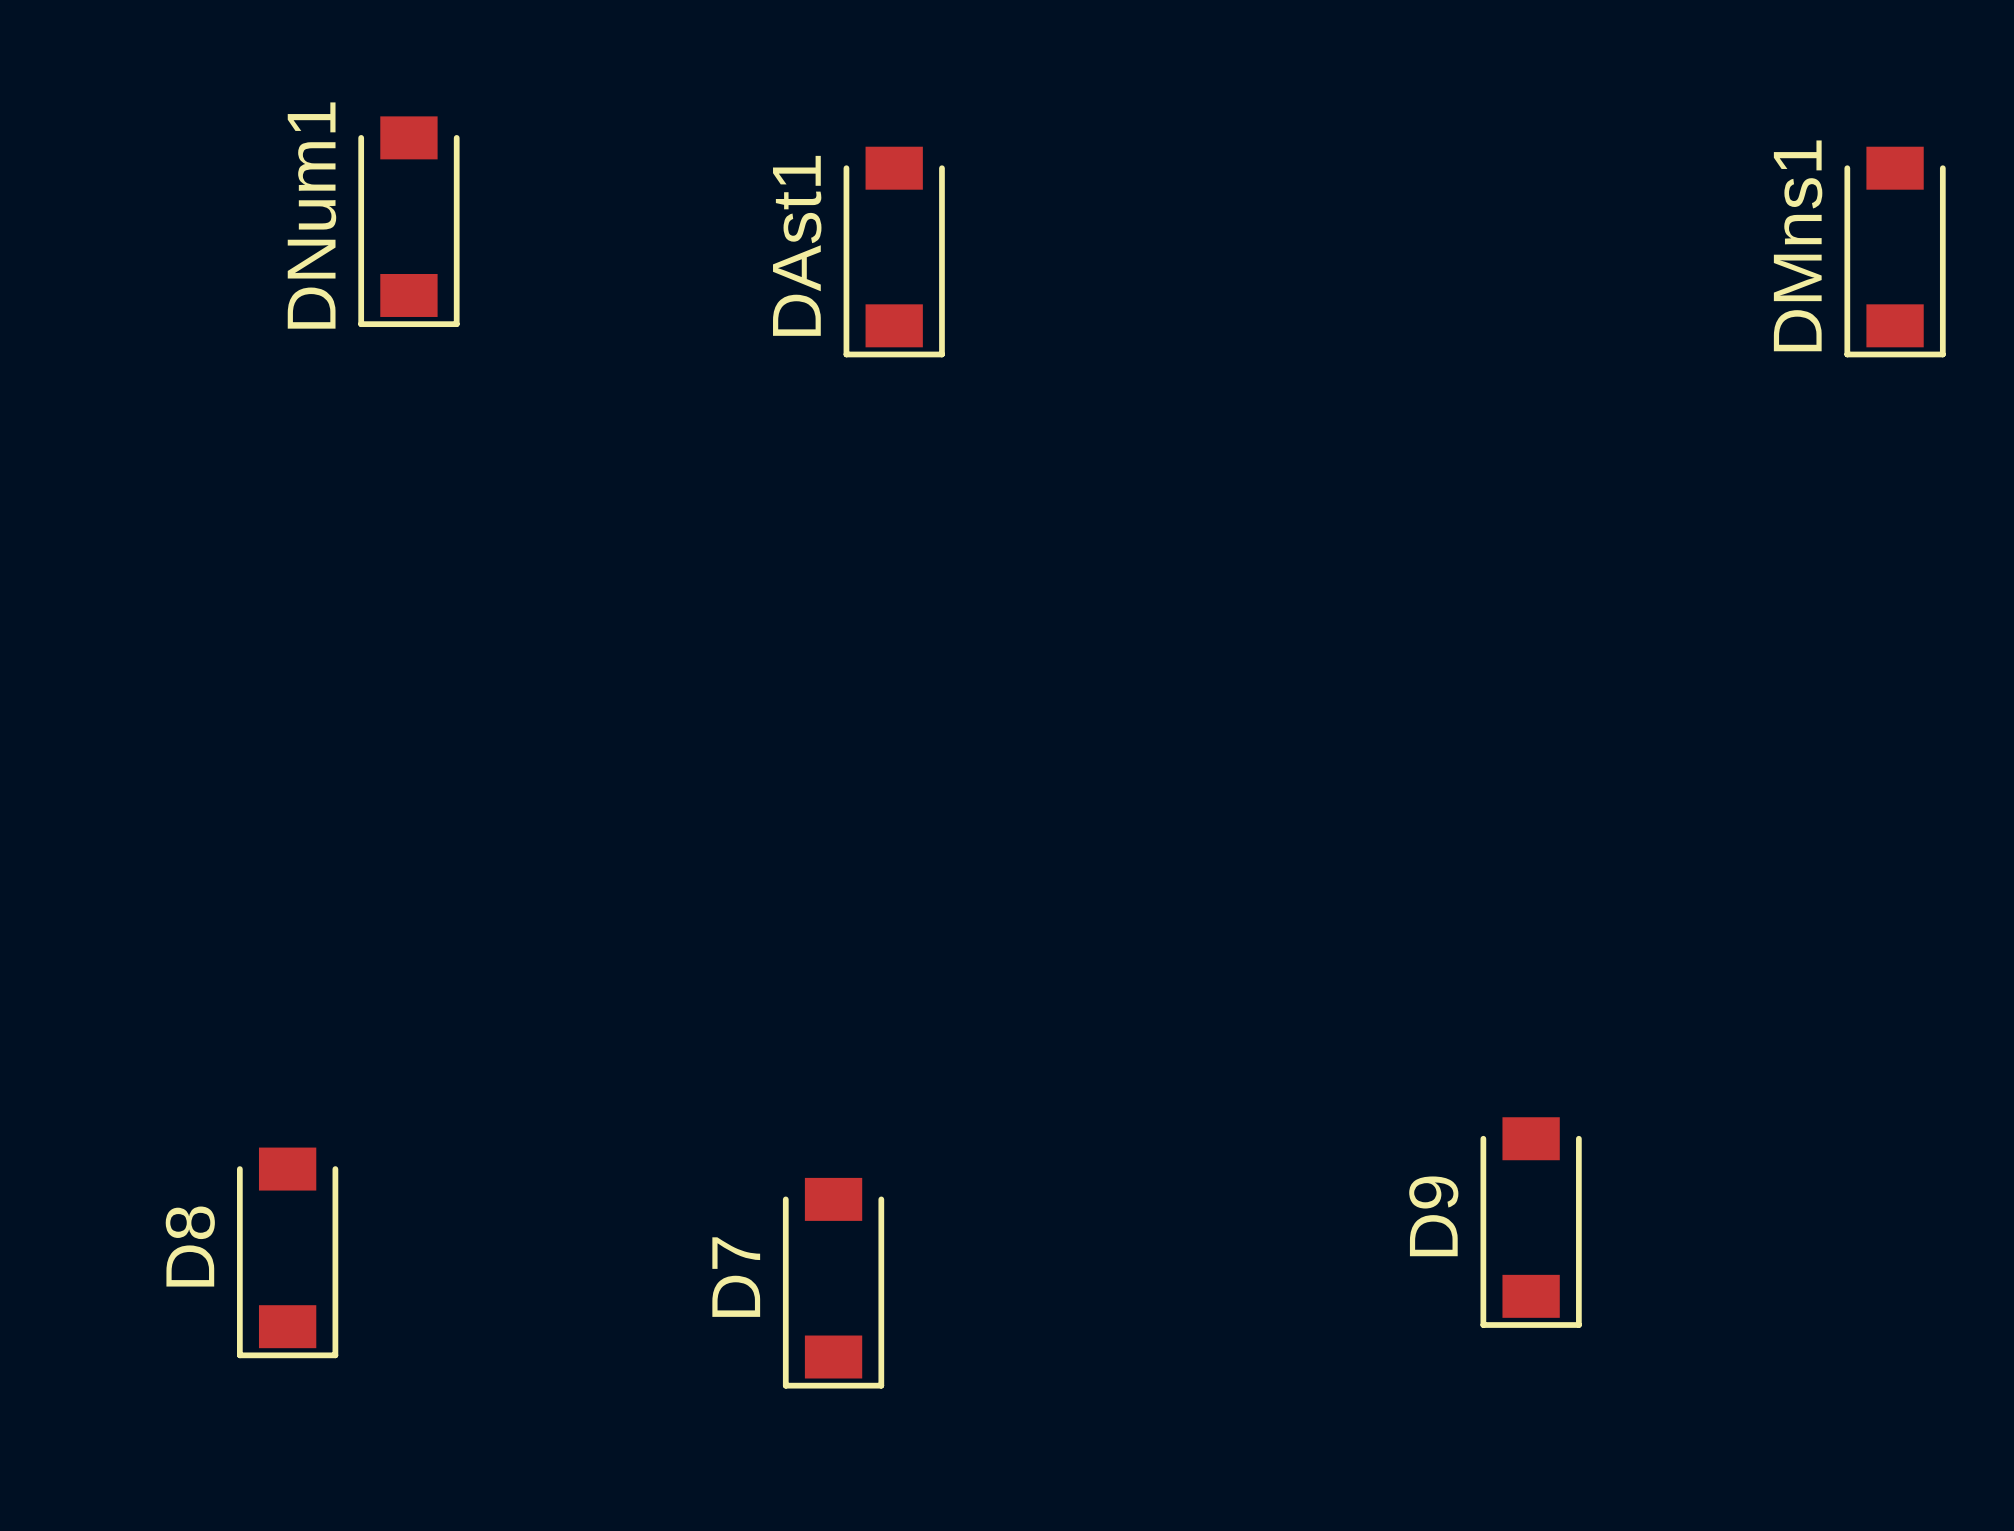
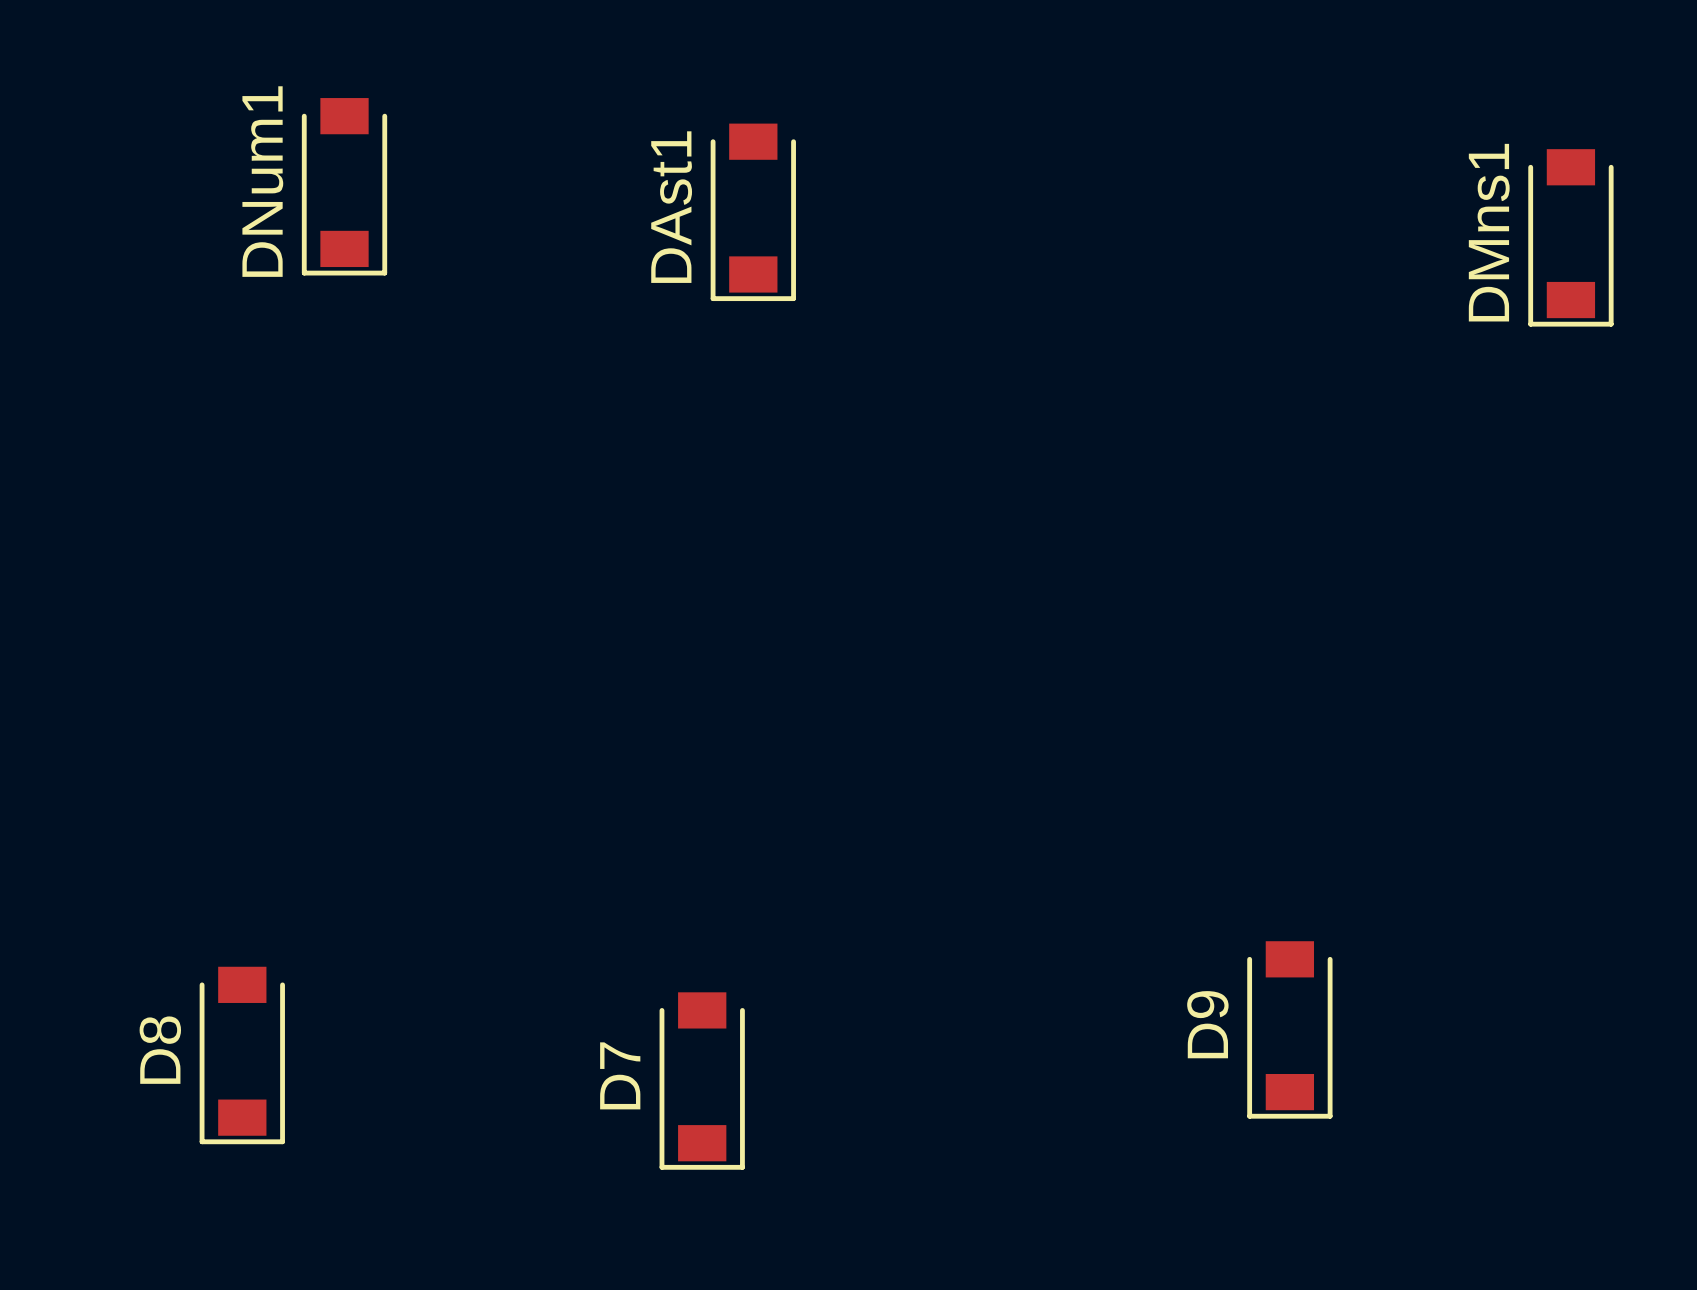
DMns1 position: (1895, 252) -> (1570, 237)

